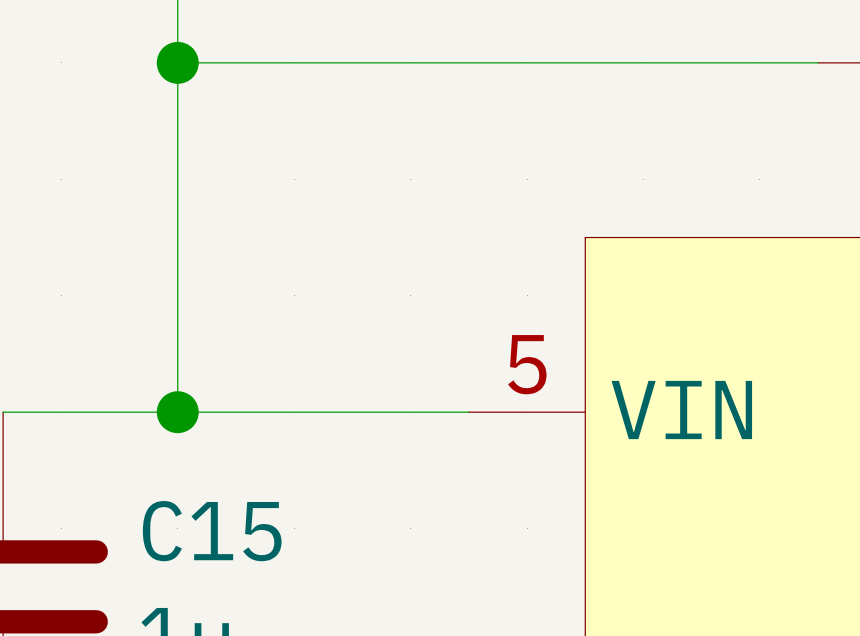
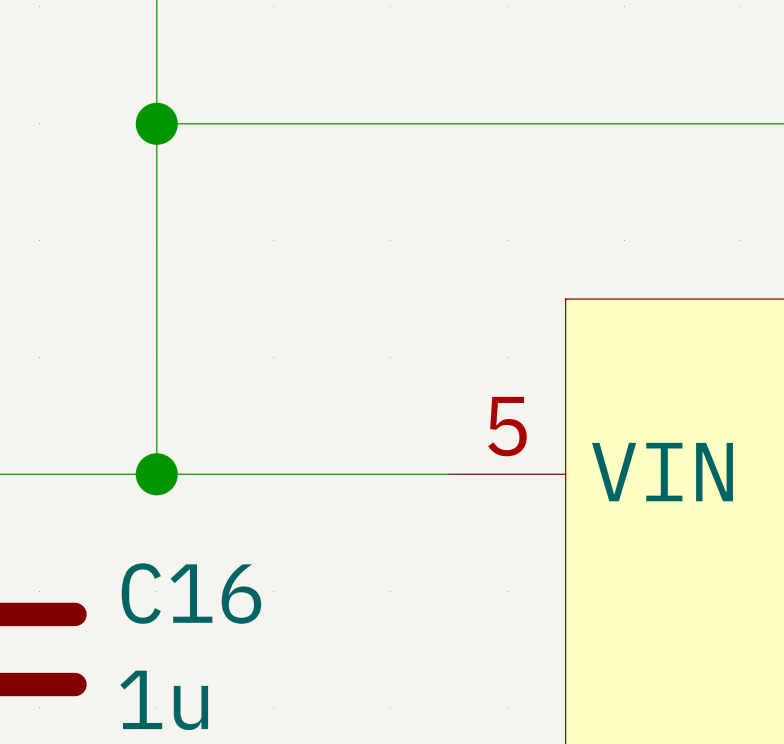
C15 name: C15 (212, 531) -> C16 (191, 593)

